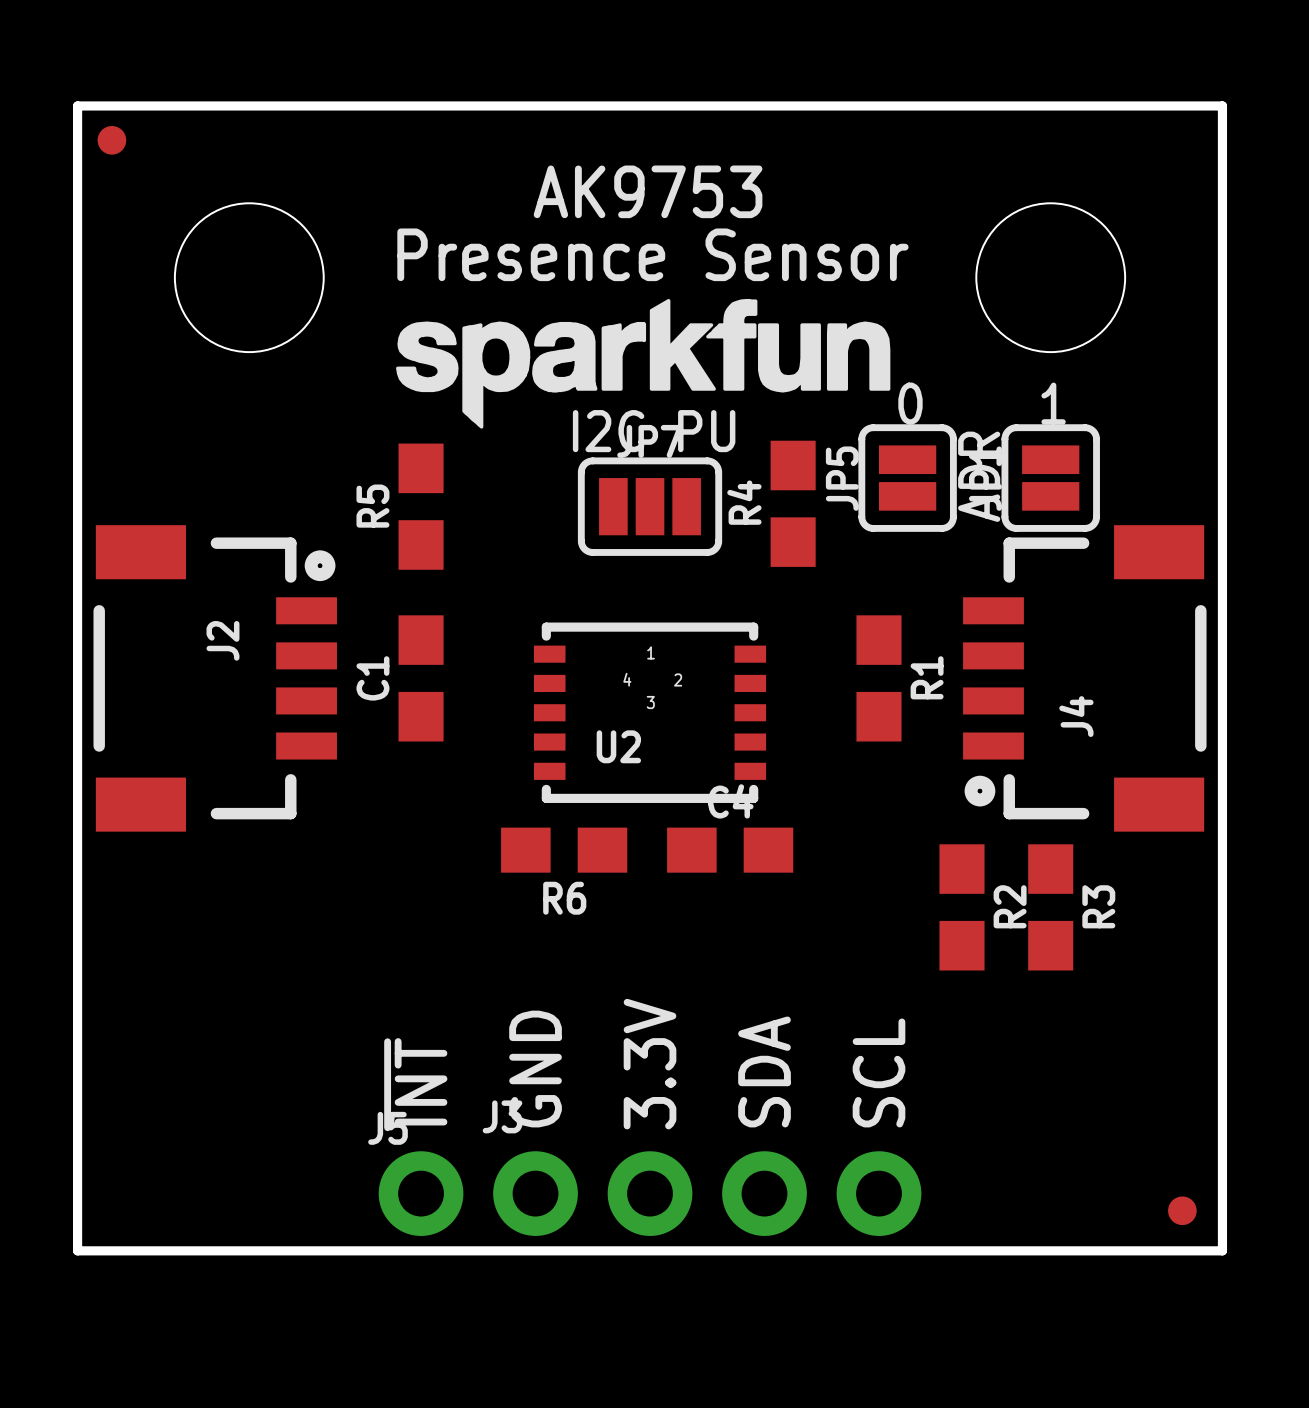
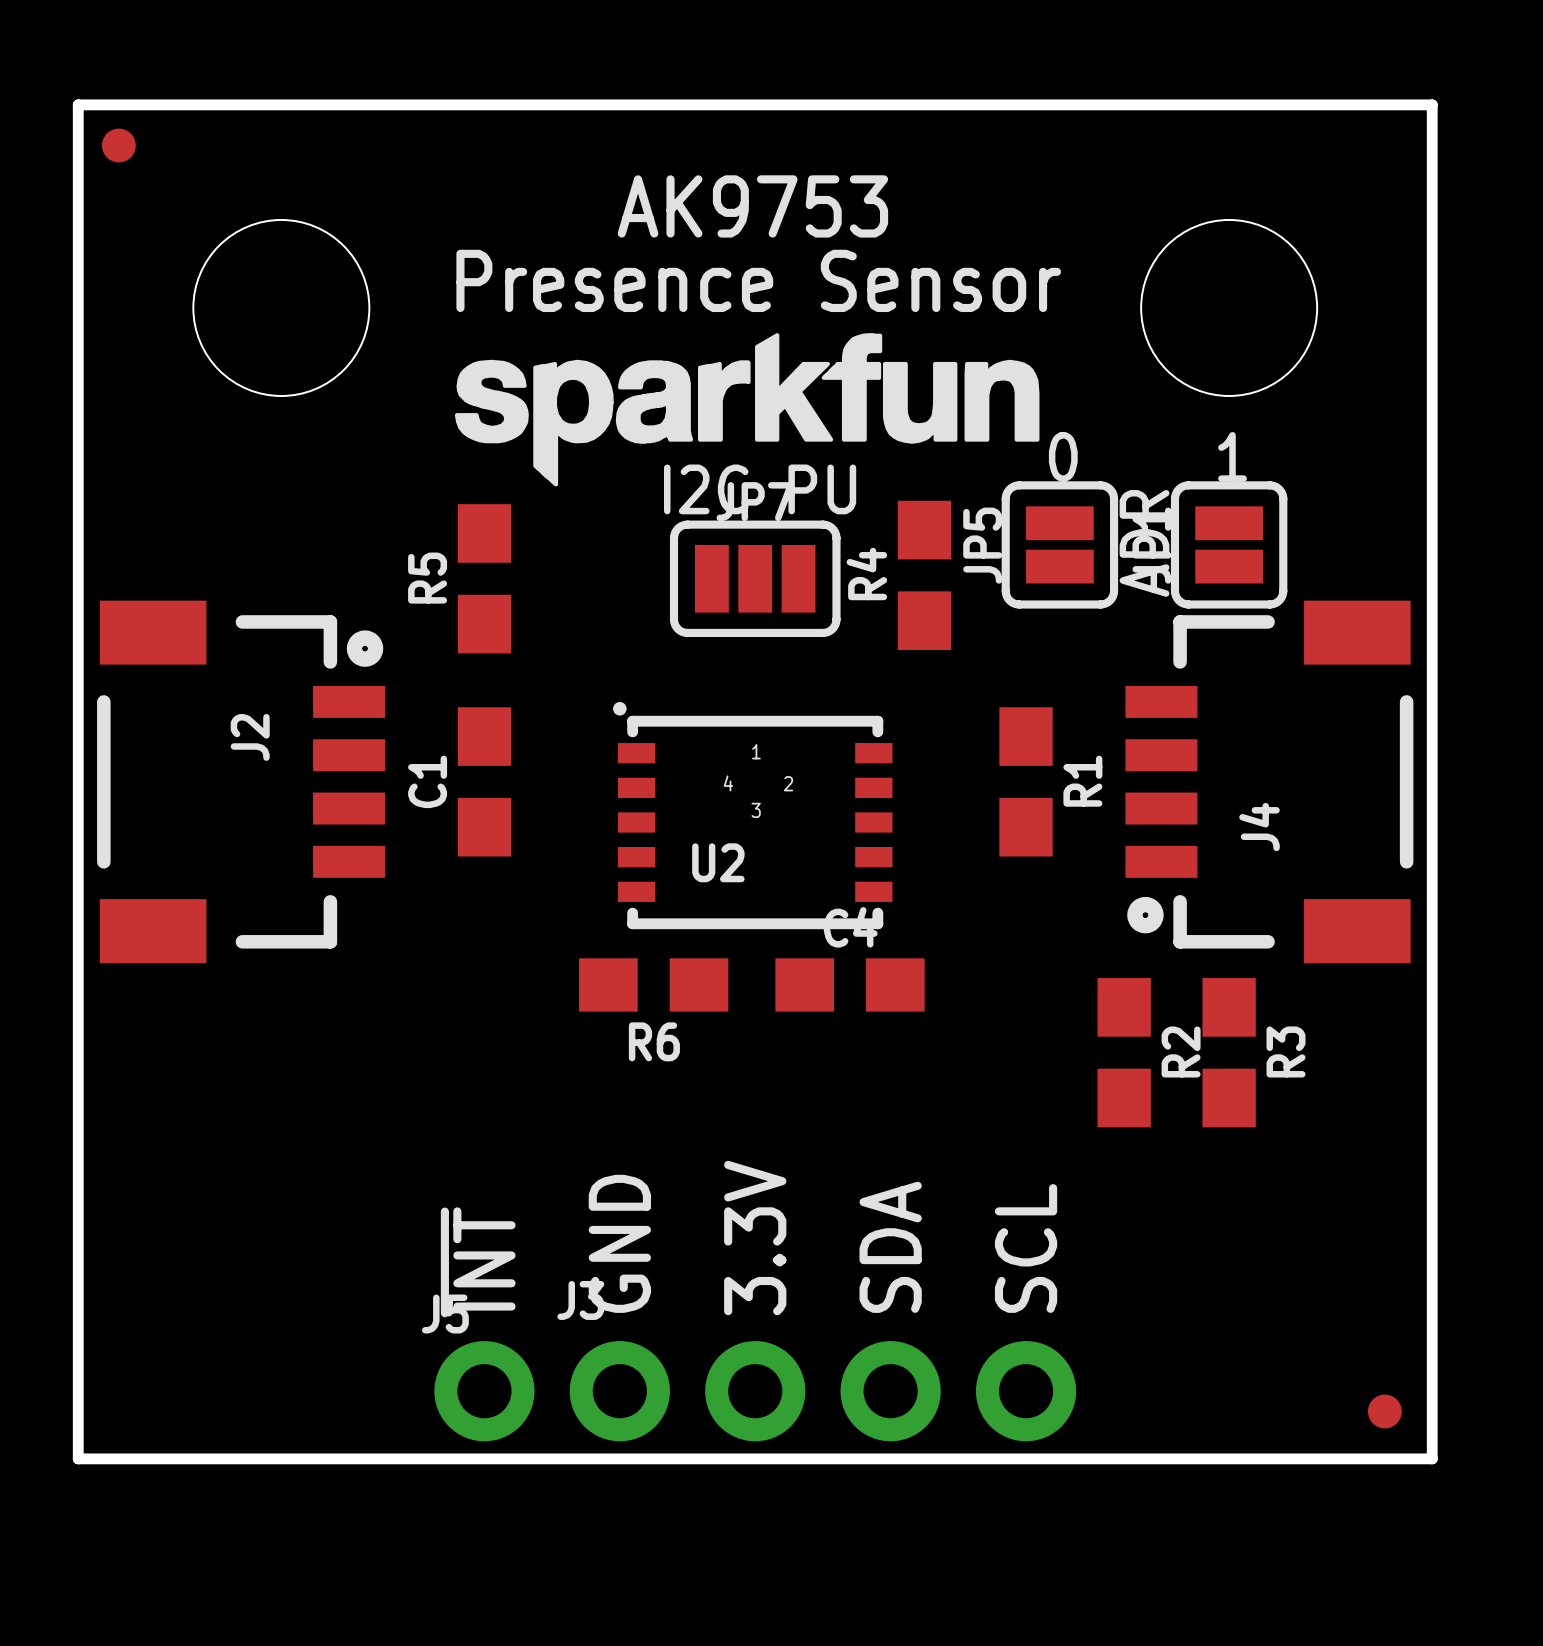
U2 footprint: [533, 622, 767, 803] -> [613, 701, 893, 930]

